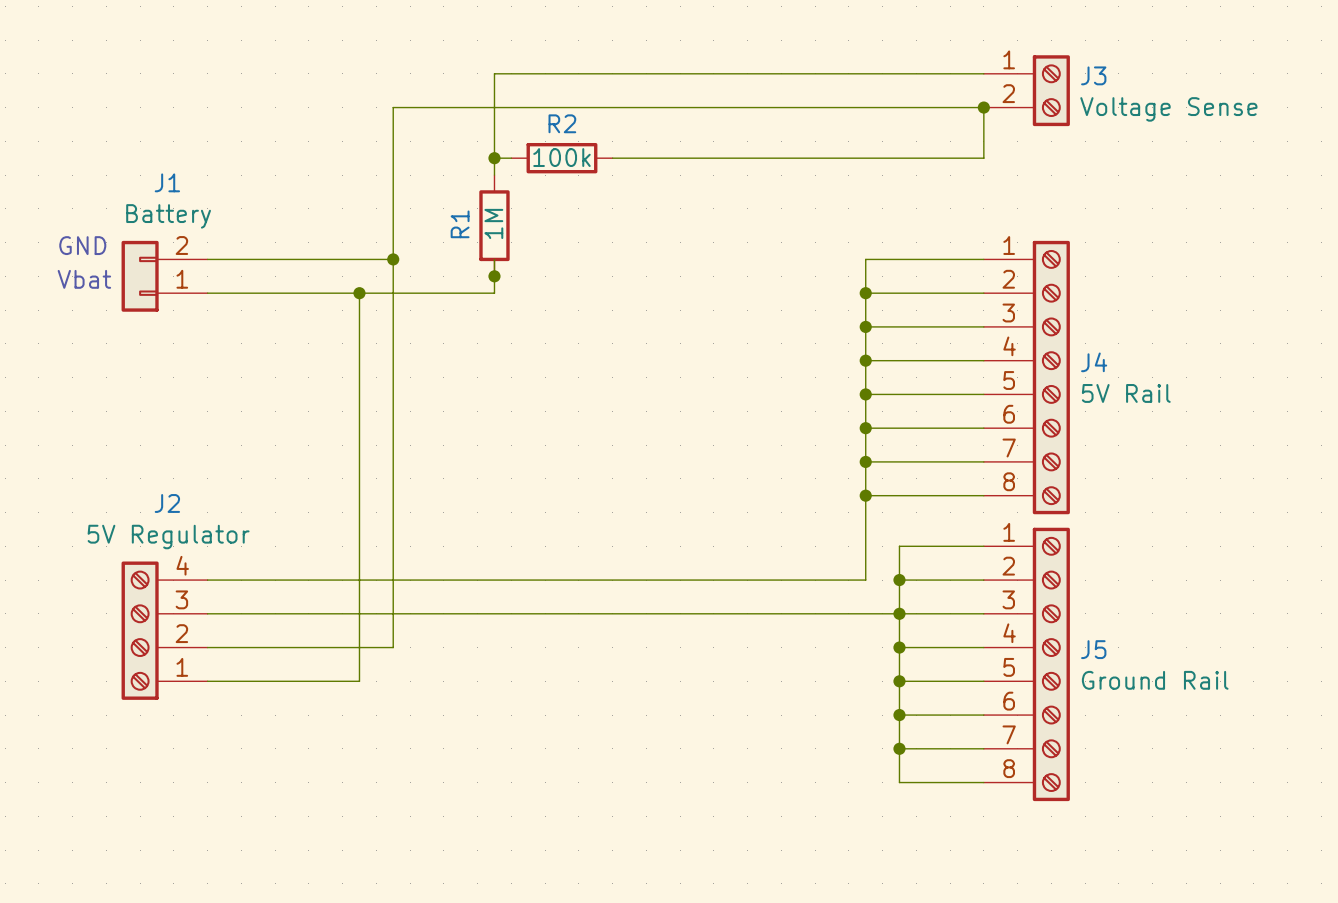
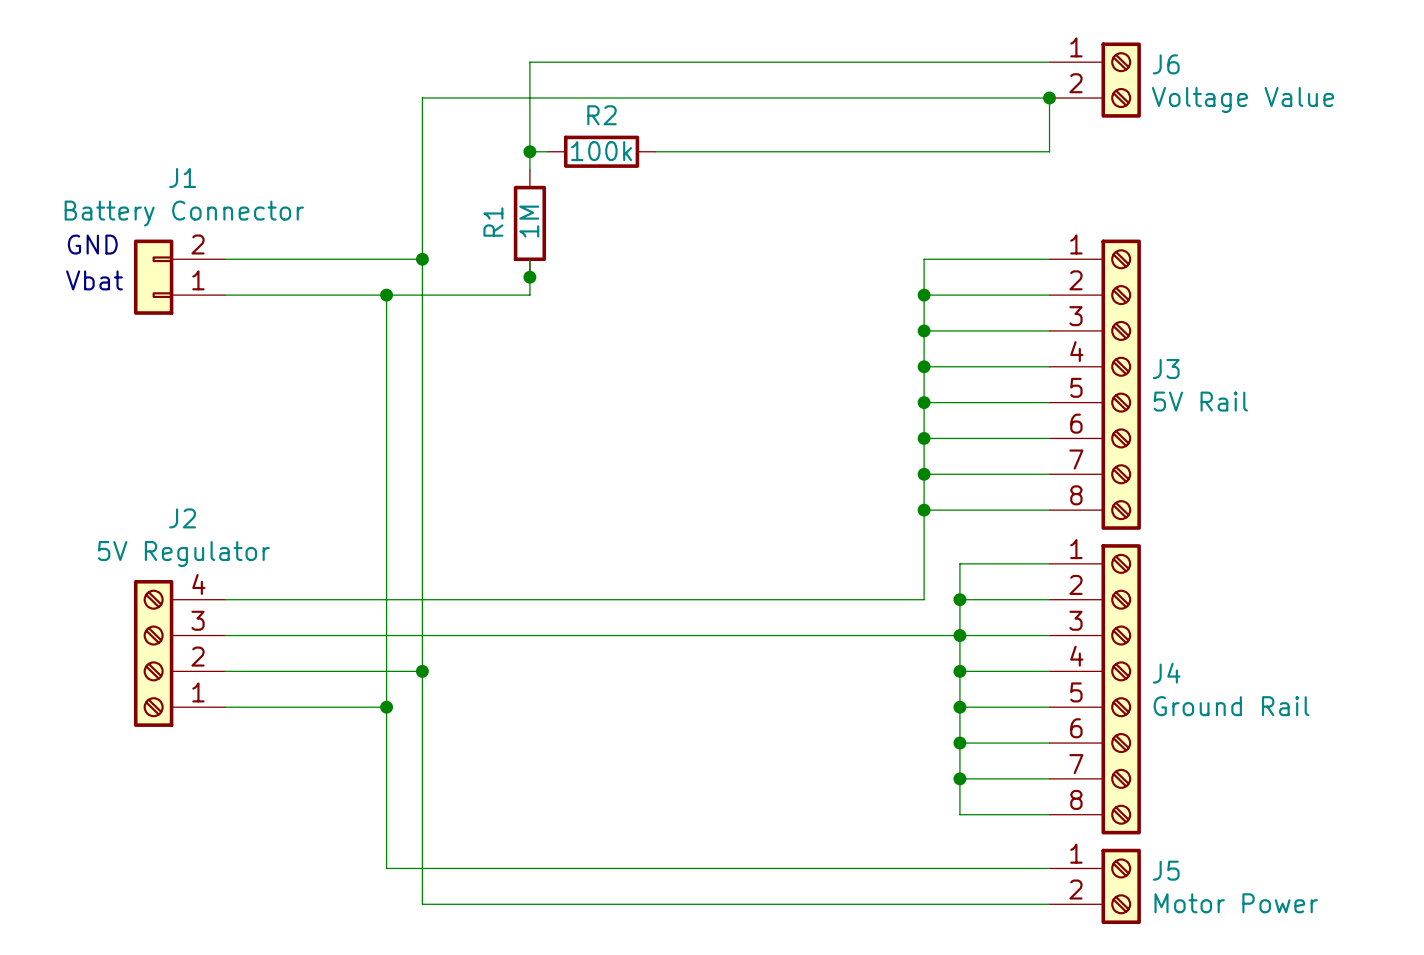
J3 name: J3 (1093, 75) -> J6 (1166, 64)
J3 value: Voltage Sense (1168, 109) -> Voltage Value (1242, 99)
J1 value: Battery (168, 216) -> Battery Connector (184, 213)
J4 name: J4 (1094, 362) -> J3 (1166, 368)
wire: none -> (422, 671) (422, 904) (1049, 904)
junction: none -> (422, 671)
J5 name: J5 (1093, 649) -> J4 (1166, 673)
wire: none -> (386, 707) (386, 868) (1049, 868)
junction: none -> (386, 707)
J5: none -> Motor Power (1095, 886)

